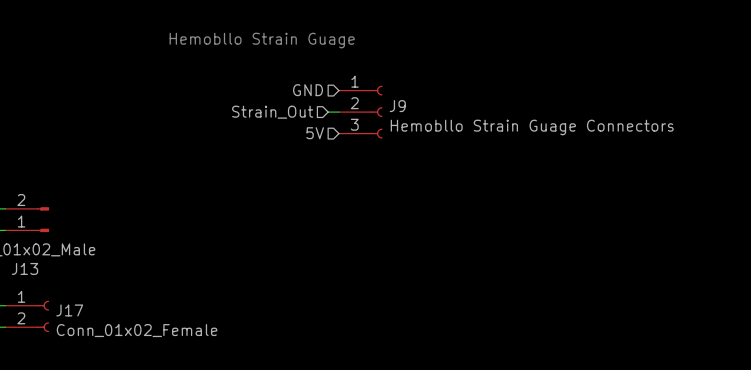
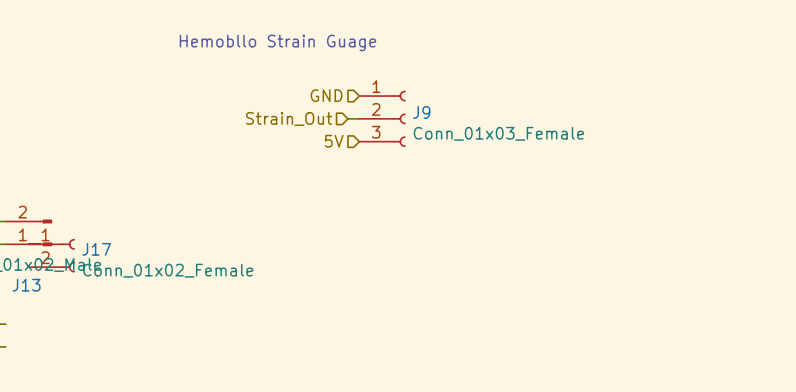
J9 value: Hemobllo Strain Guage Connectors (532, 127) -> Conn_01x03_Female (498, 133)
J17 position: (27, 316) -> (51, 255)

